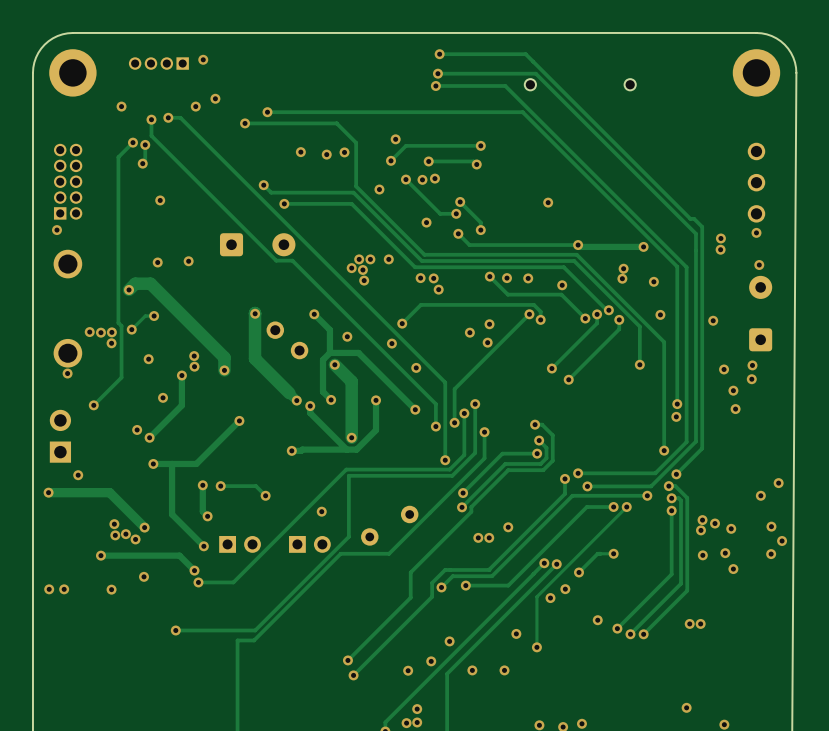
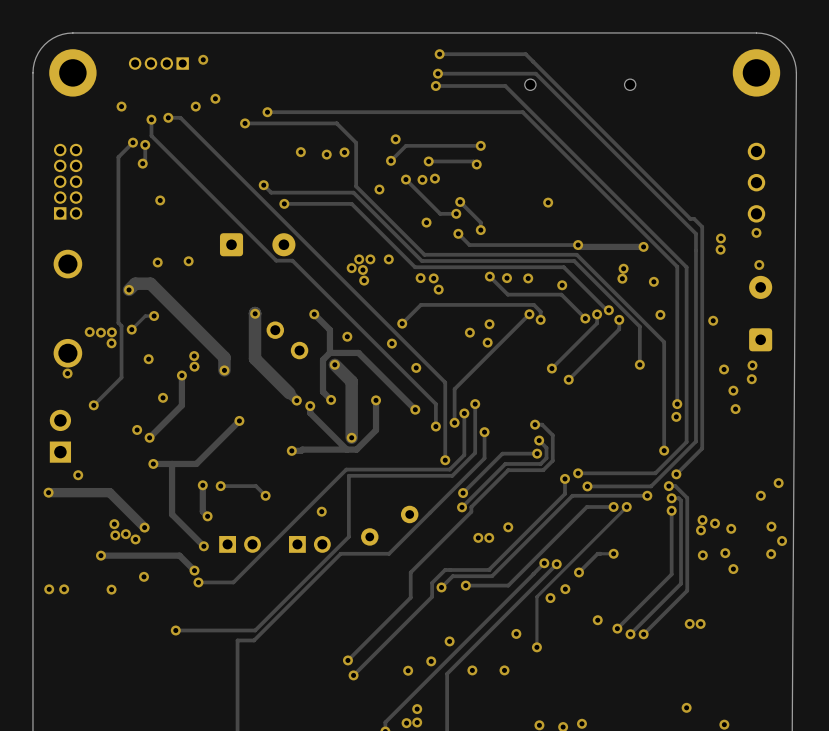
via: (56, 230) -> none

